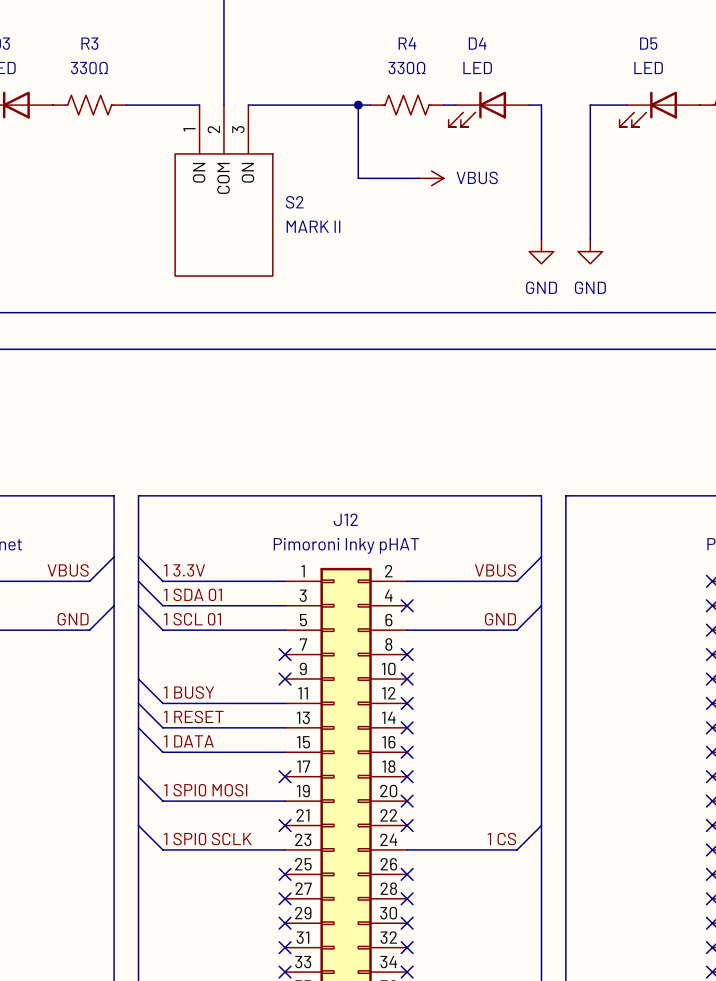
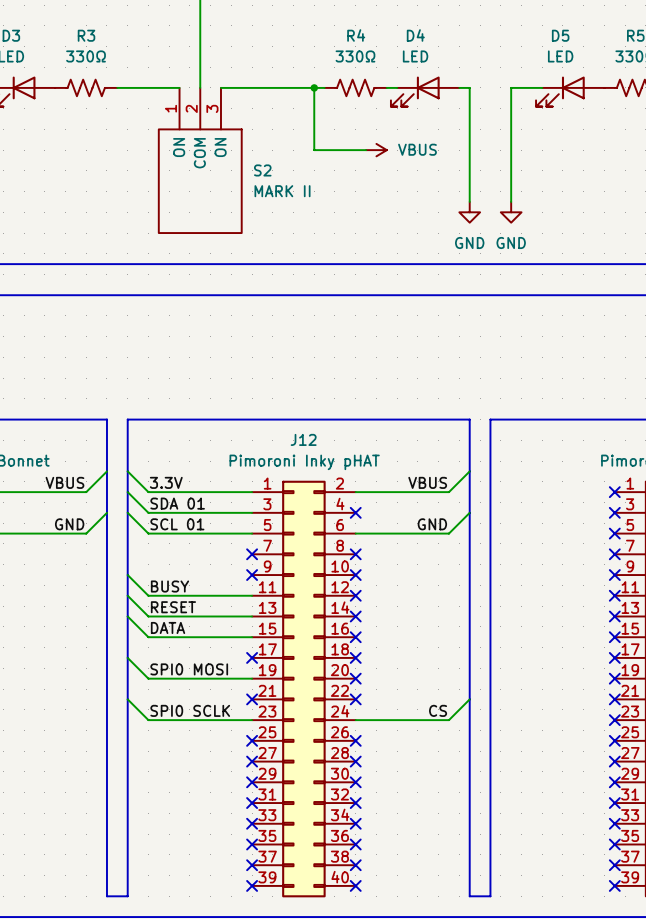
label: 1 3.3V (184, 570) -> 3.3V (166, 482)
label: 1 SDA 01 (192, 594) -> SDA 01 (177, 503)
label: 1 SCL 01 (192, 619) -> SCL 01 (177, 524)
label: 1 BUSY (189, 692) -> BUSY (169, 586)
label: 1 RESET (193, 716) -> RESET (173, 607)
label: 1 DATA (188, 741) -> DATA (168, 627)
label: 1 SPI0 MOSI (205, 790) -> SPI0 MOSI (189, 669)
label: 1 SPI0 SCLK (207, 839) -> SPI0 SCLK (190, 710)
label: 1 CS (501, 839) -> CS (438, 710)

